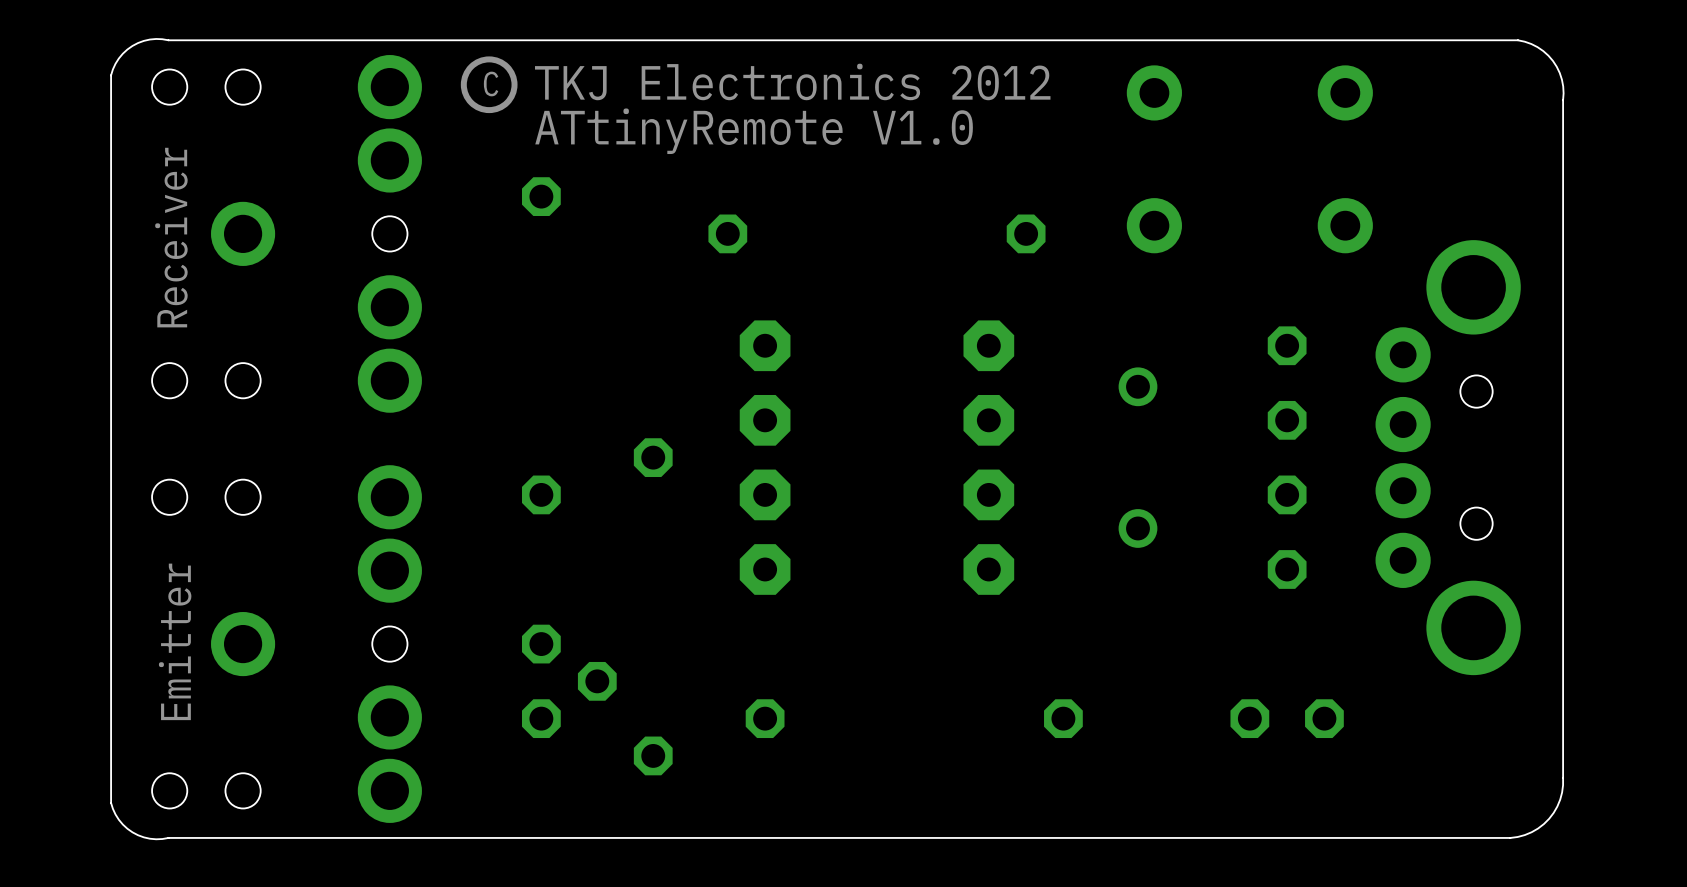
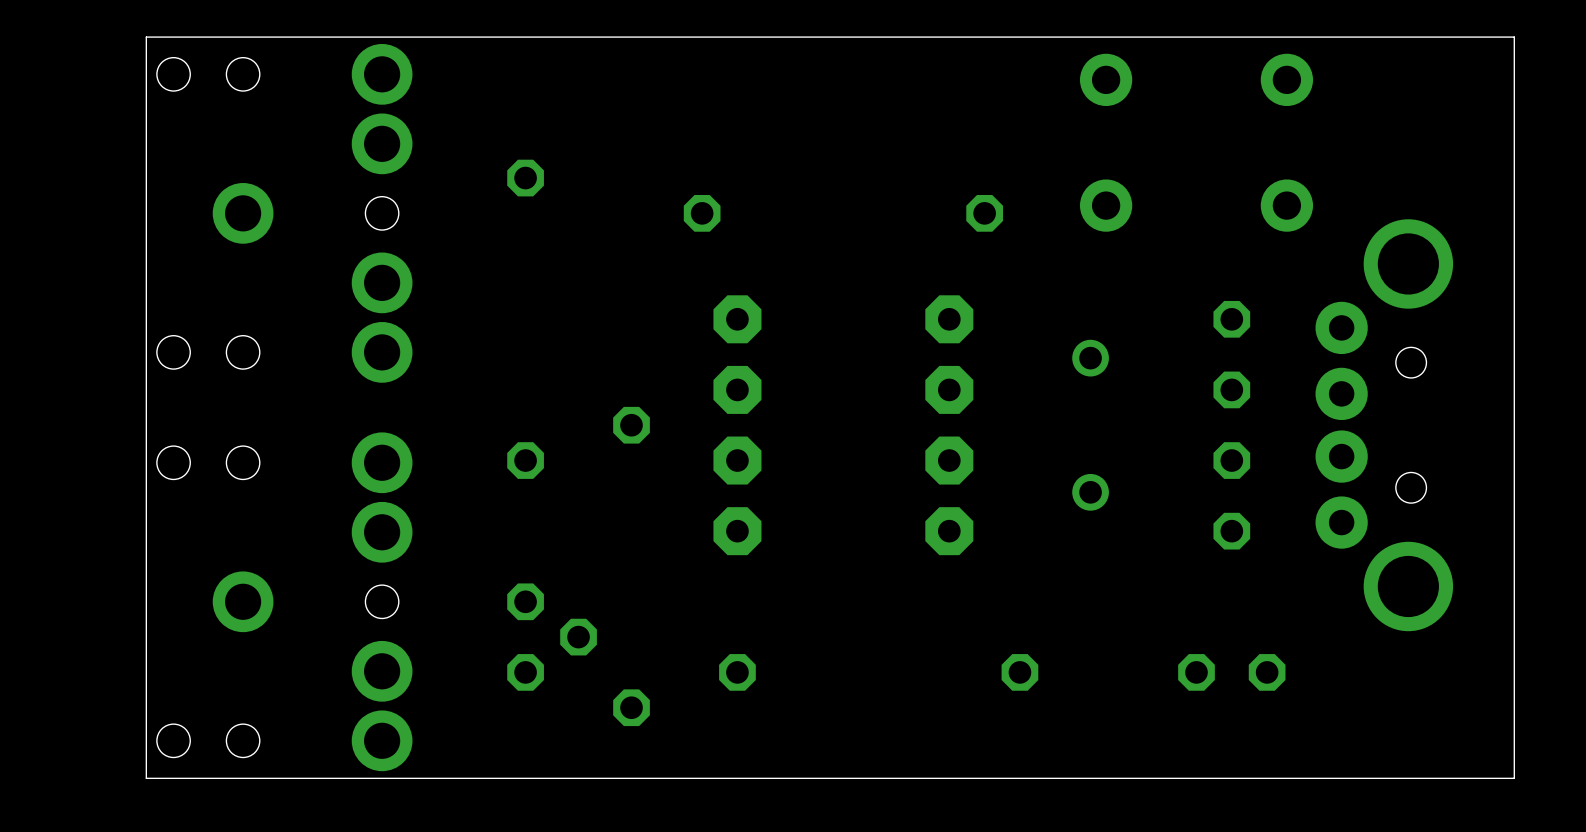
board edge: (1518, 40) (156, 38) (143, 40) (132, 45) (118, 58) (111, 75) (111, 802) (115, 814) (122, 824) (132, 832) (143, 837) (156, 839) (1510, 837) (1531, 832) (1543, 824) (1553, 812) (1560, 799) (1563, 785) (1563, 93) (1559, 73) (1548, 55) (1531, 44) (1518, 40) -> (1514, 37) (1514, 778) (146, 778) (146, 37) (1514, 37)
drawing: [460, 56, 518, 114] -> none
text: TKJ Electronics 2012 (792, 81) -> none
text: C (491, 83) -> none
text: ATtinyRemote V1.0 (754, 131) -> none
text: Receiver (171, 237) -> none
text: Emitter (175, 641) -> none

